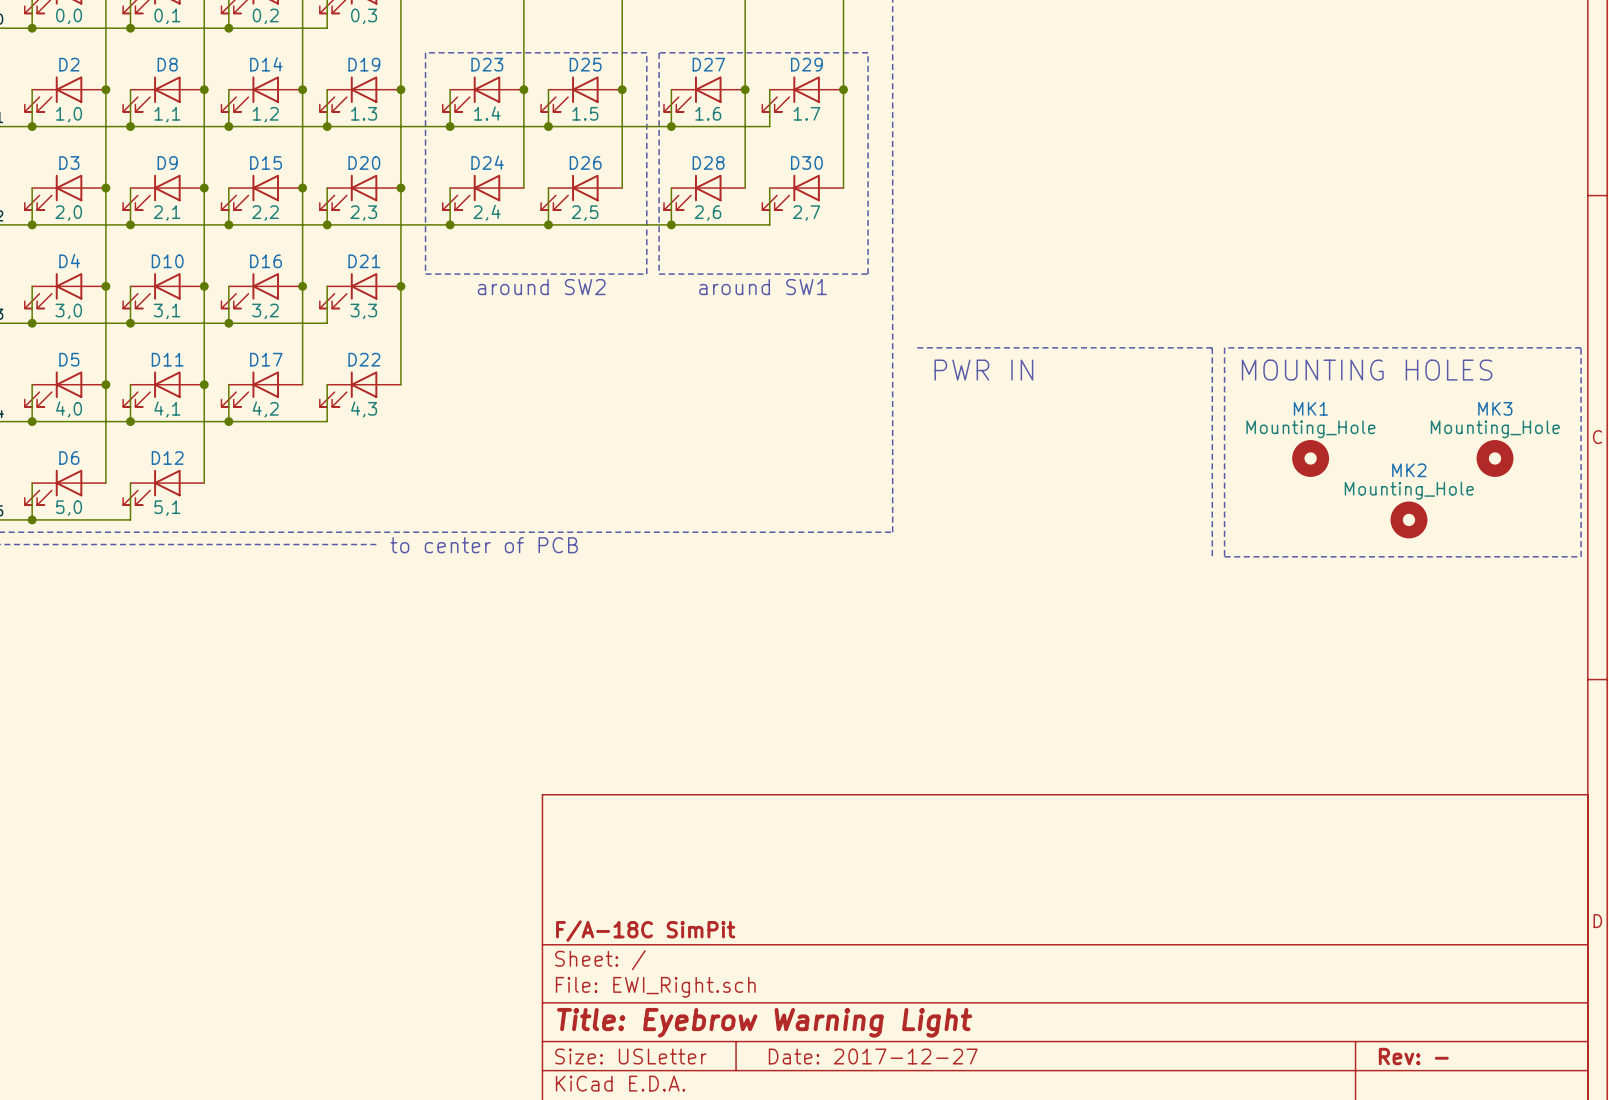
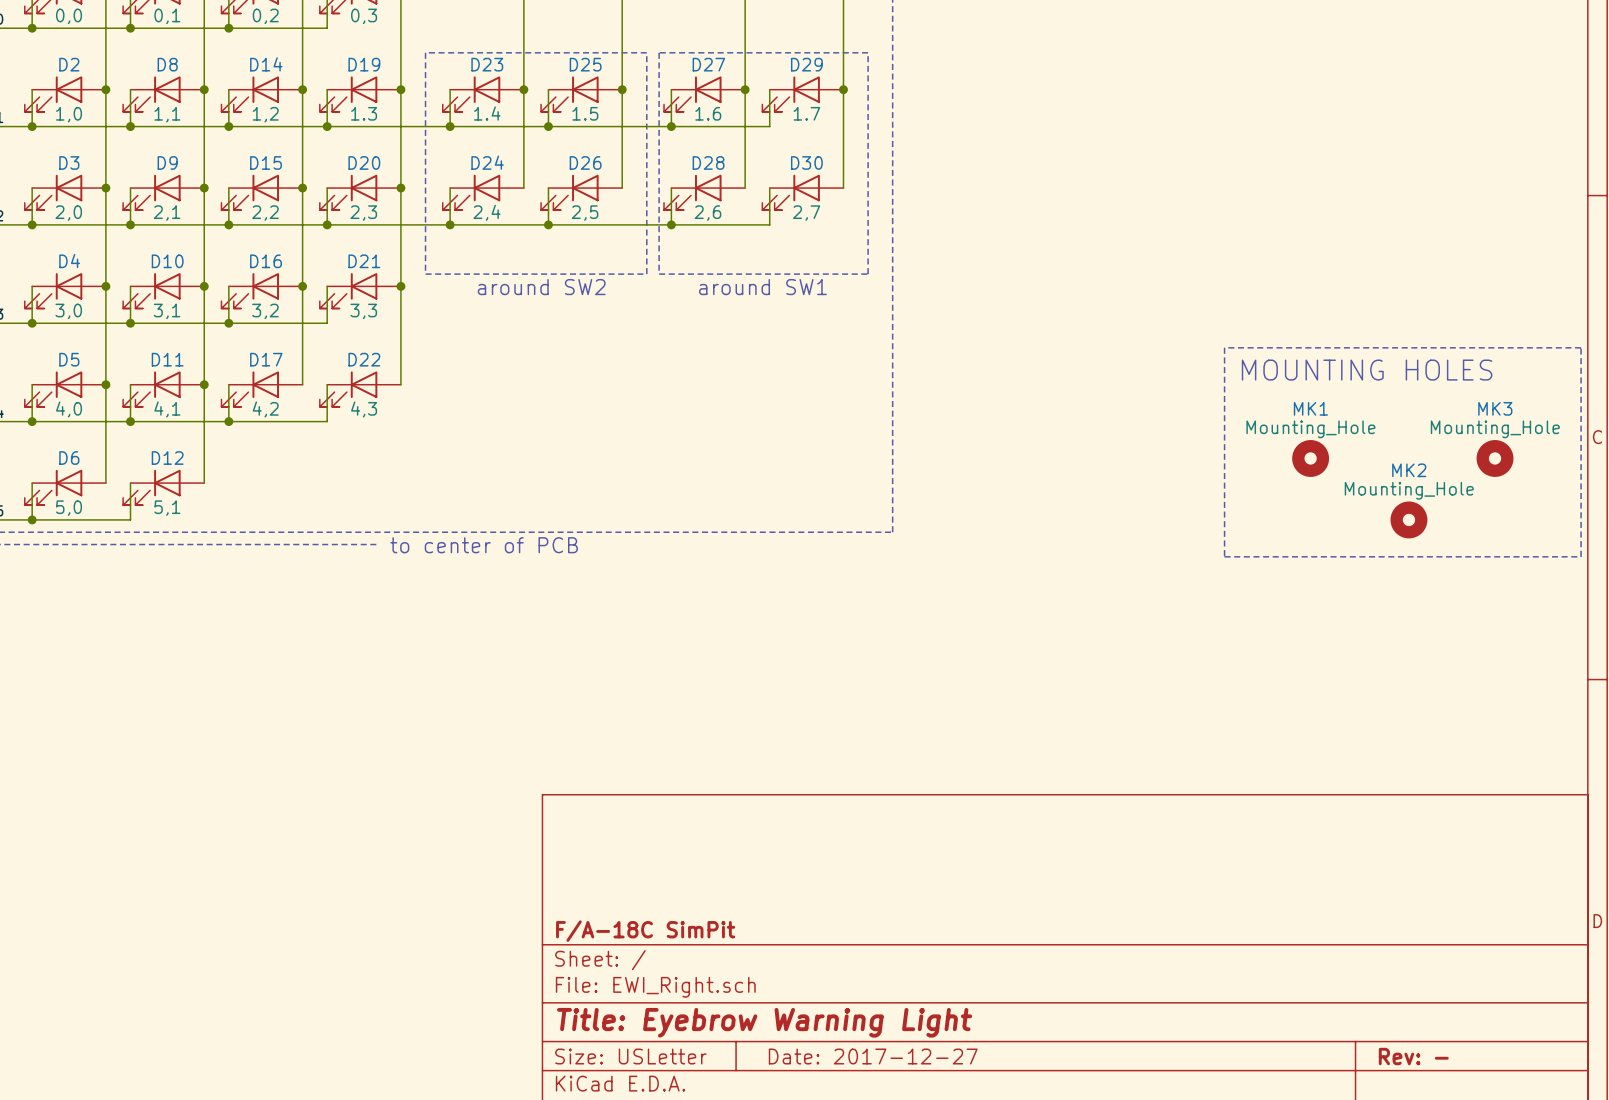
line: (917, 347) (1212, 347) (1212, 556) -> none
text: PWR IN (983, 370) -> none

